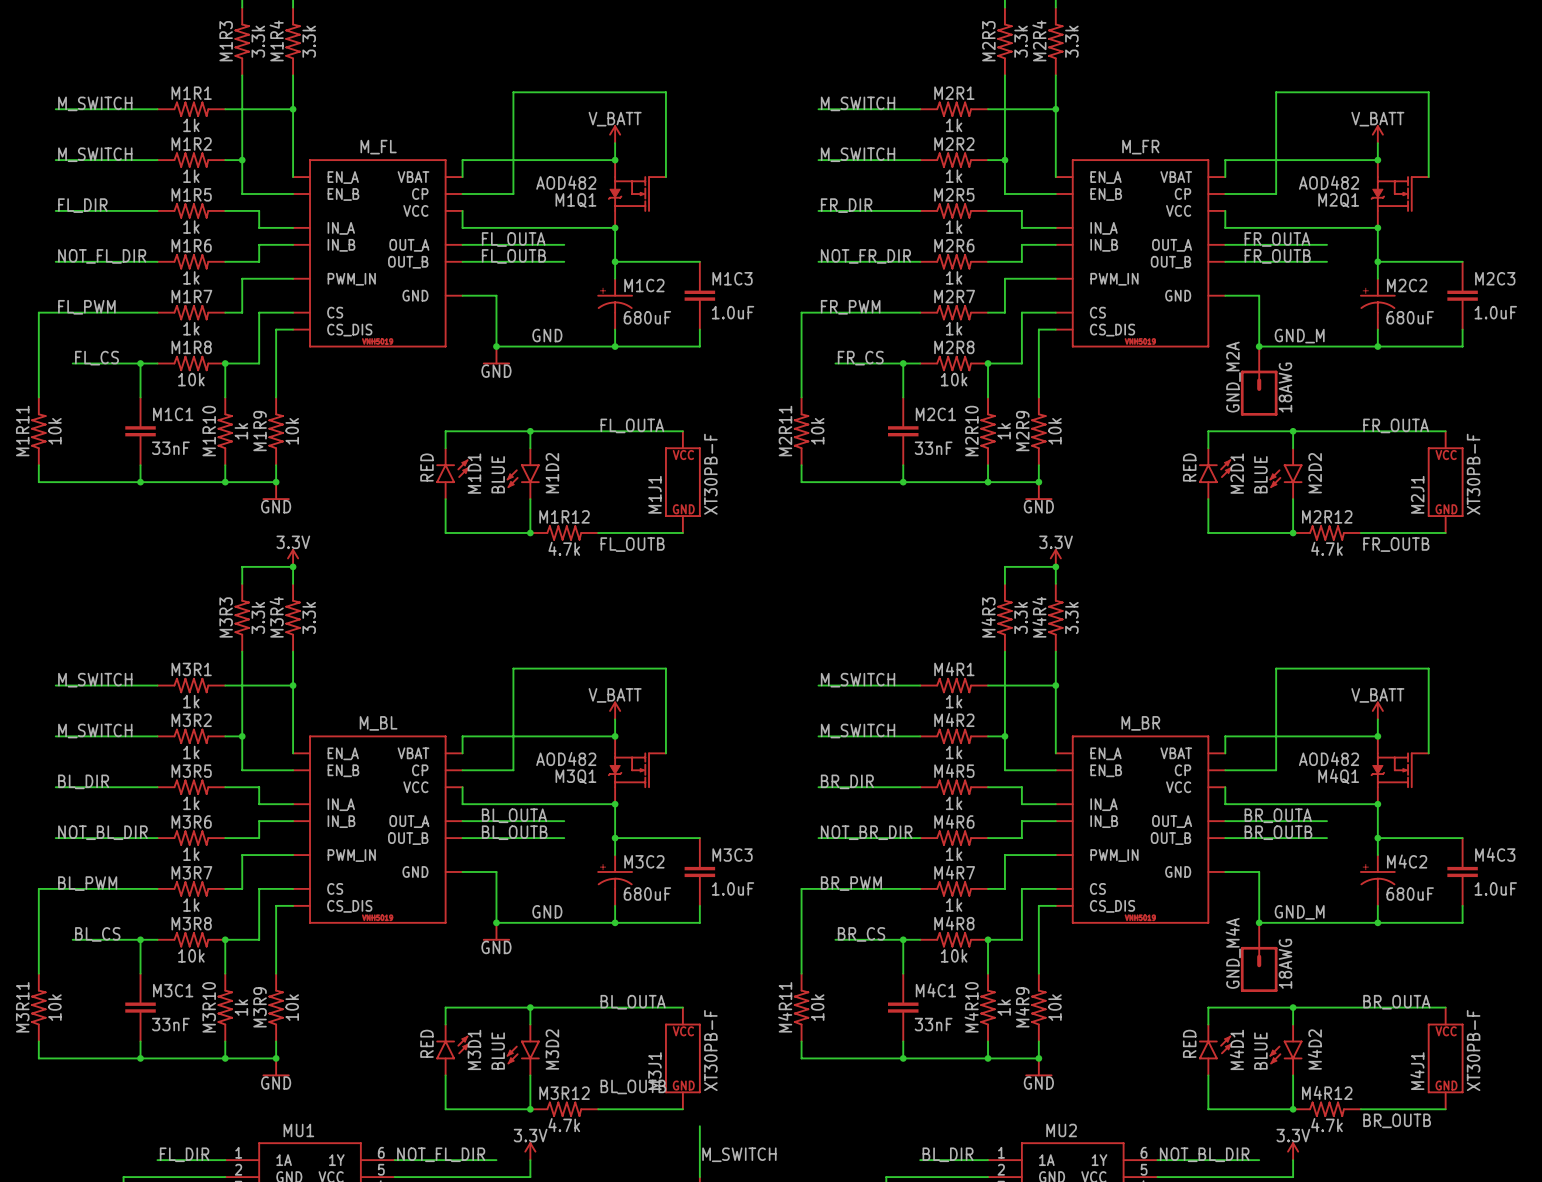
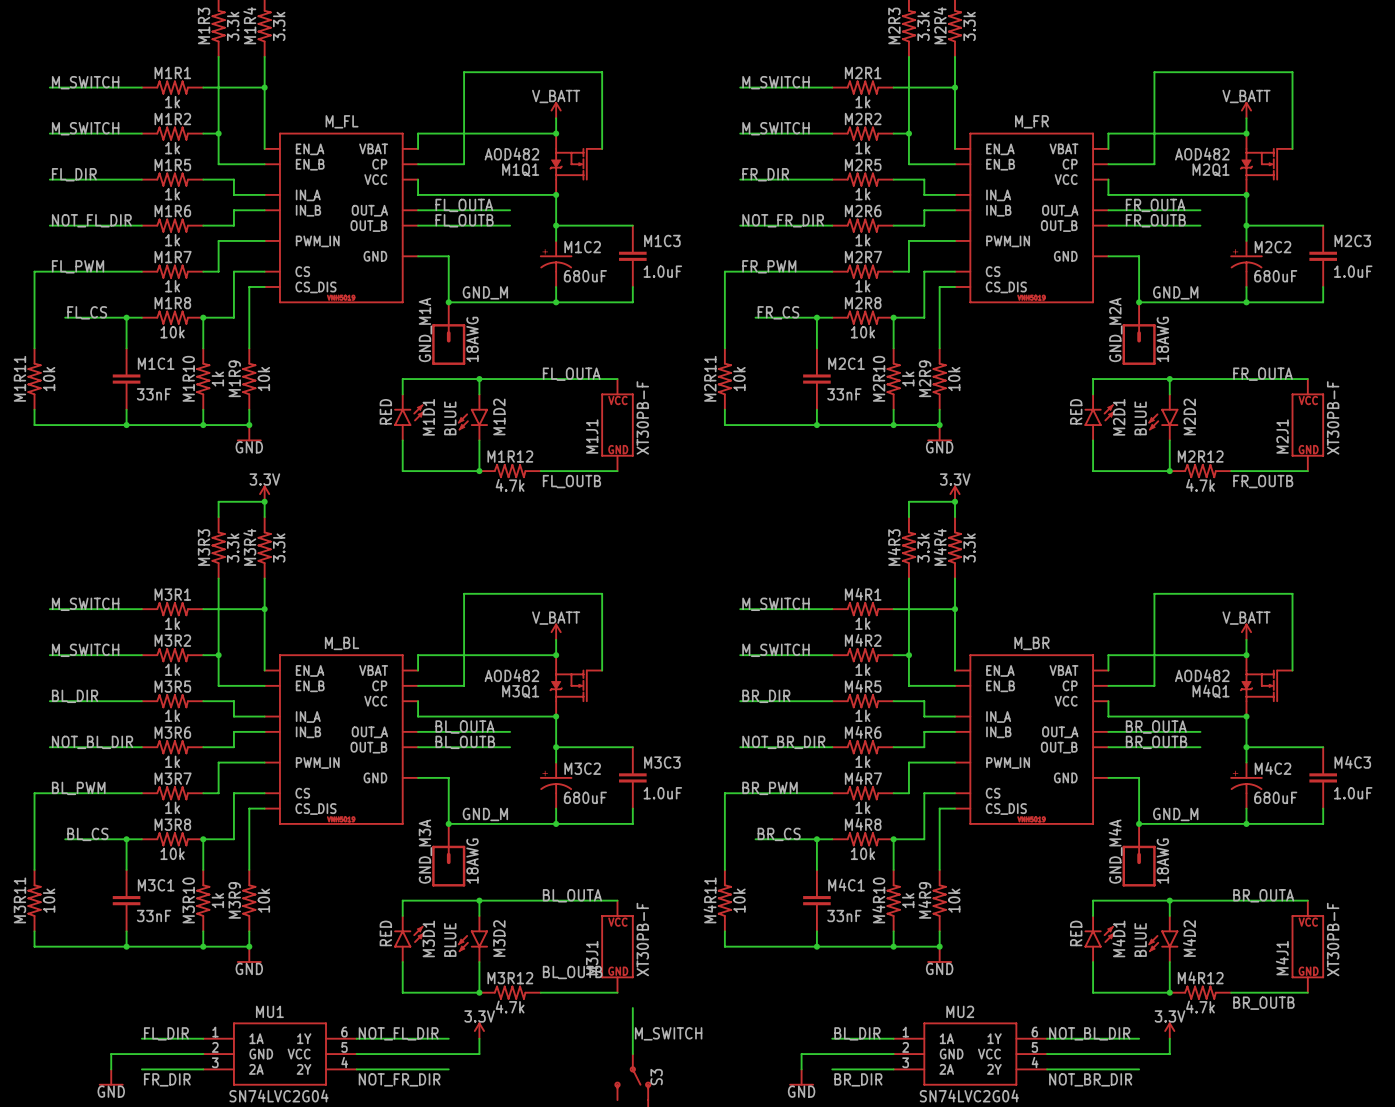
label: GND (547, 335) -> GND_M (485, 292)
power symbol: GND (496, 355) -> none
GND_M1A: none -> 18AWG (448, 333)
label: GND (547, 911) -> GND_M (485, 814)
power symbol: GND (496, 931) -> none
GND_M3A: none -> 18AWG (448, 855)

